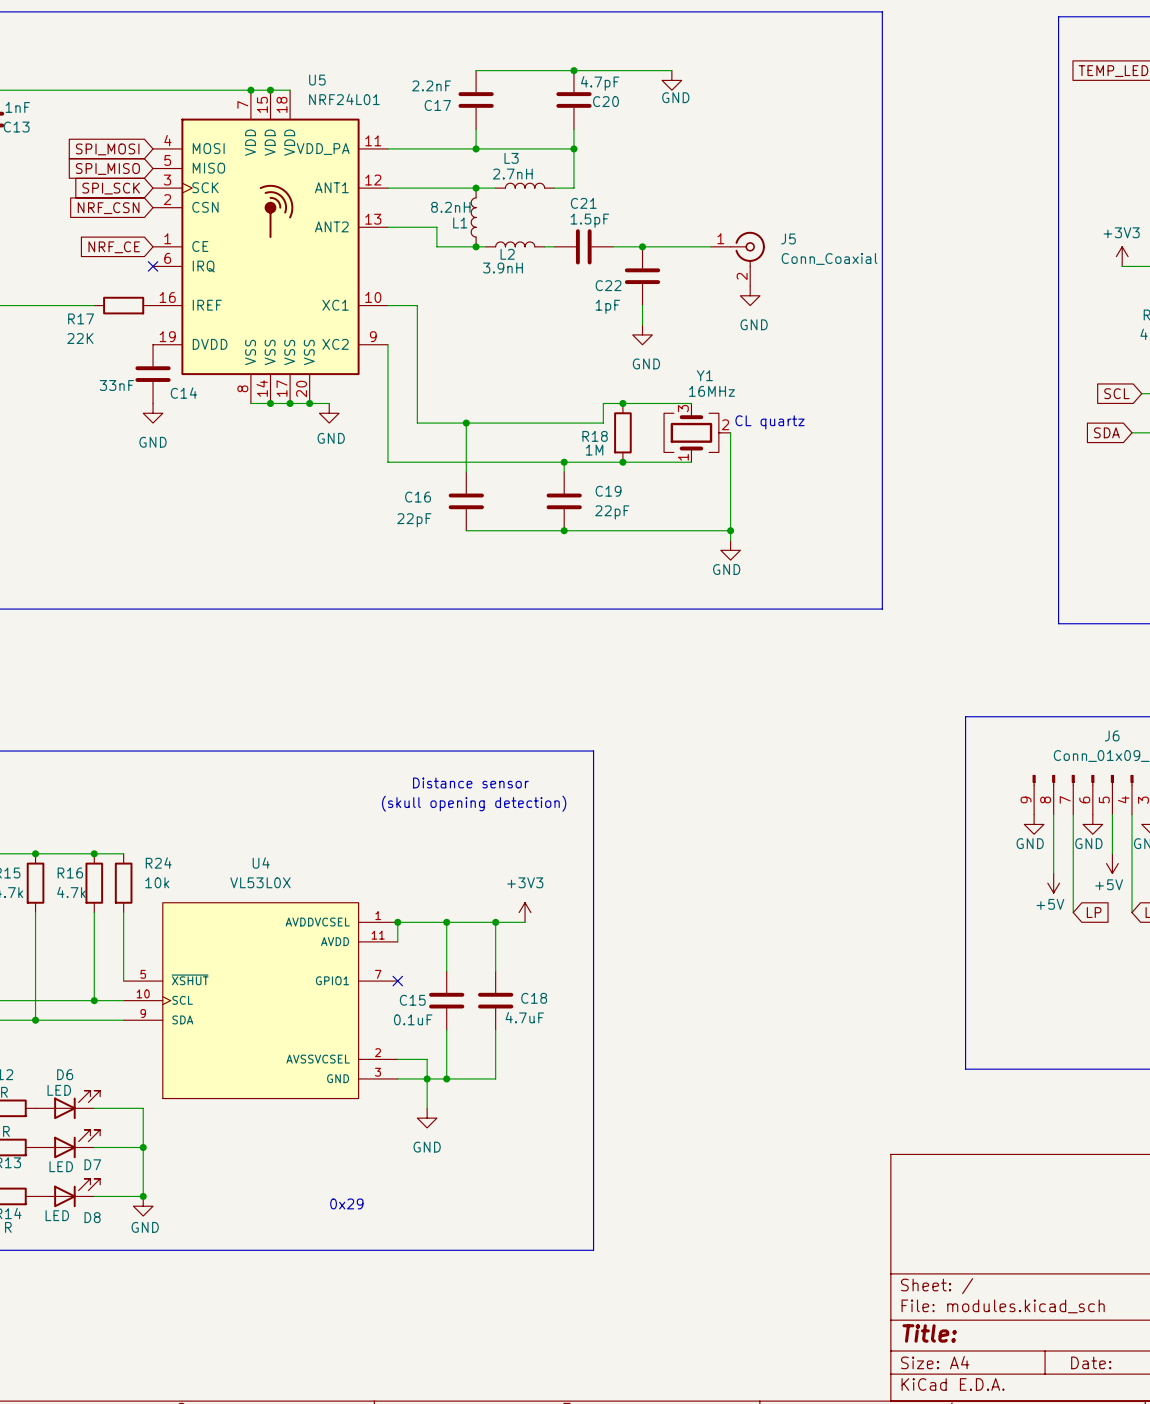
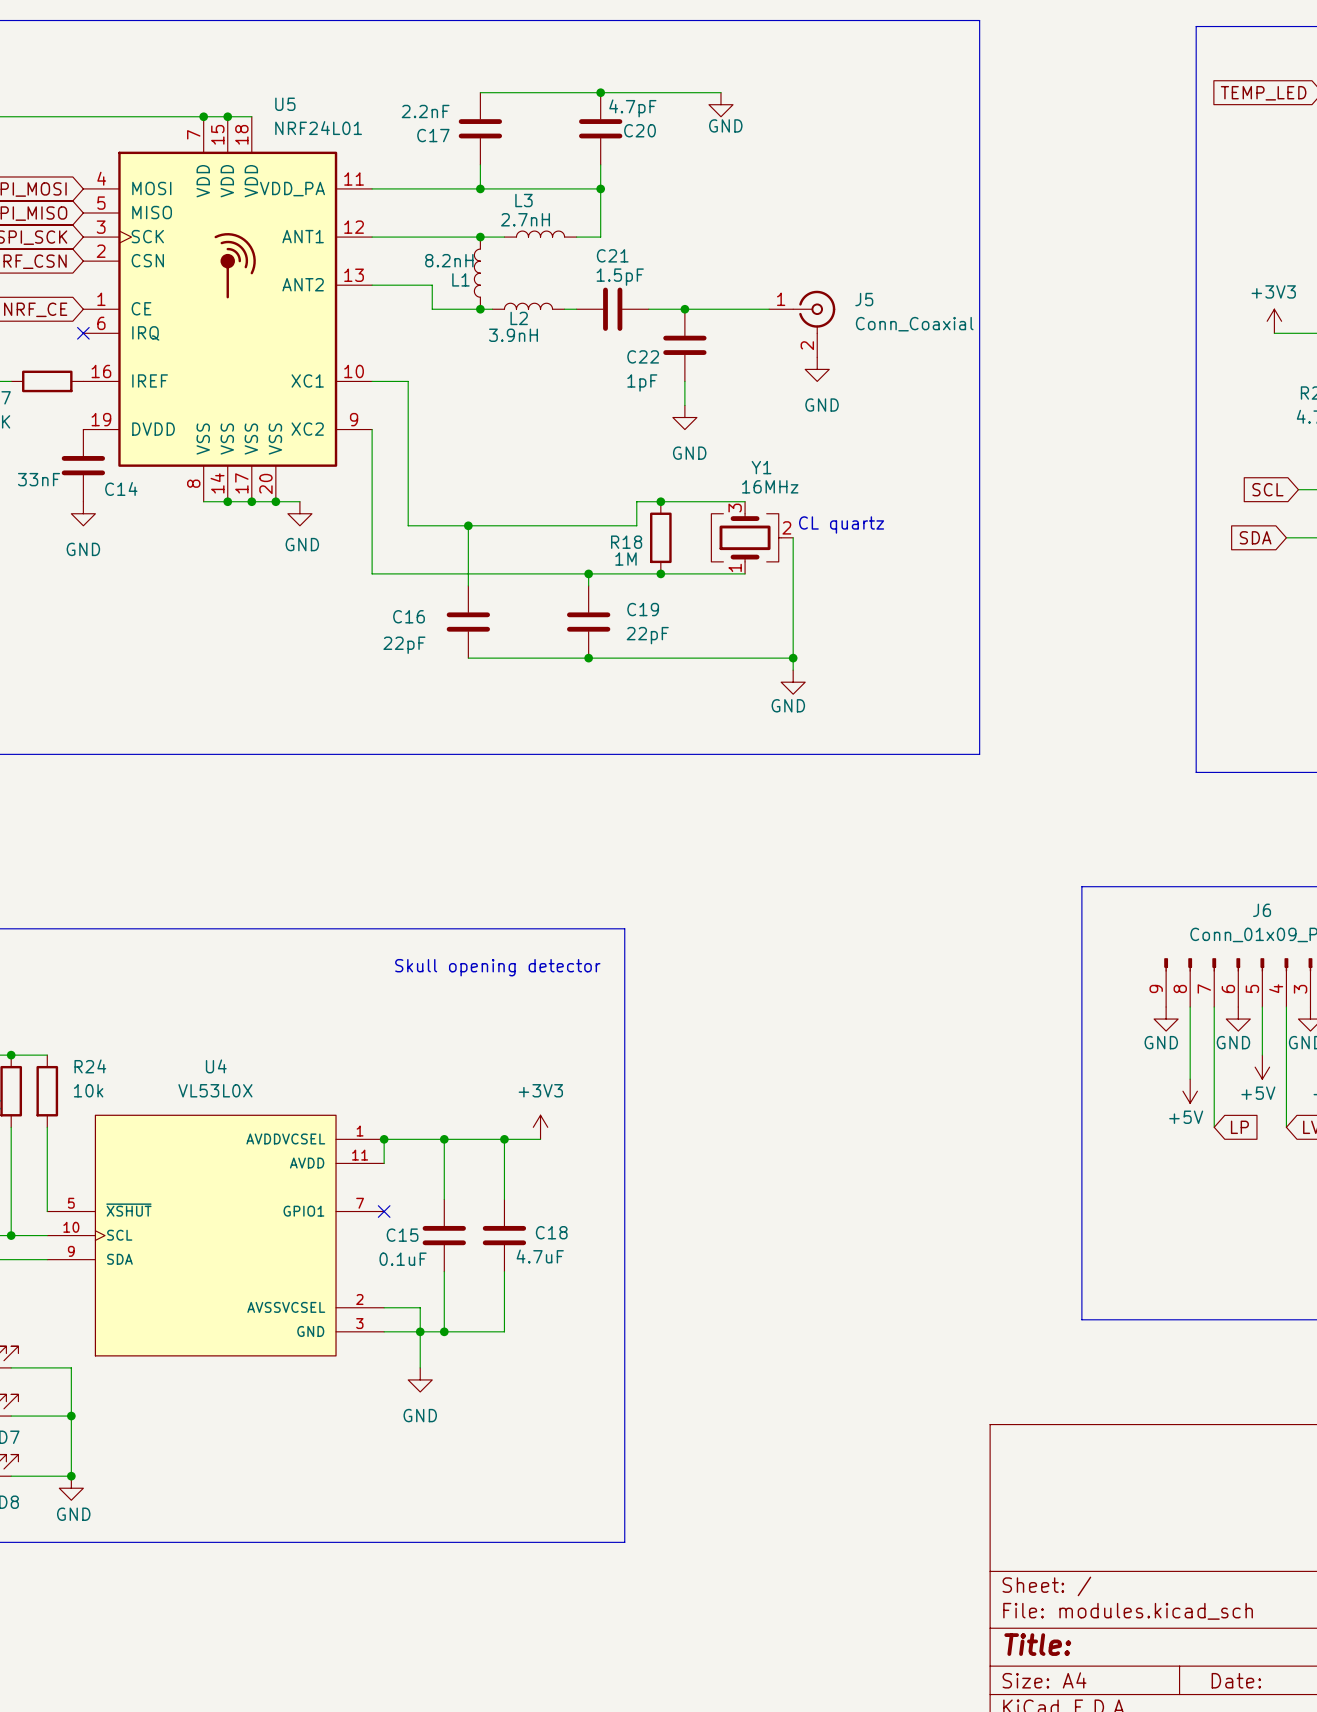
text: Distance sensor (470, 782) -> none
text: none -> Skull opening detector (497, 967)
text: (skull opening detection) (474, 803) -> none
text: 0x29 (346, 1203) -> none

